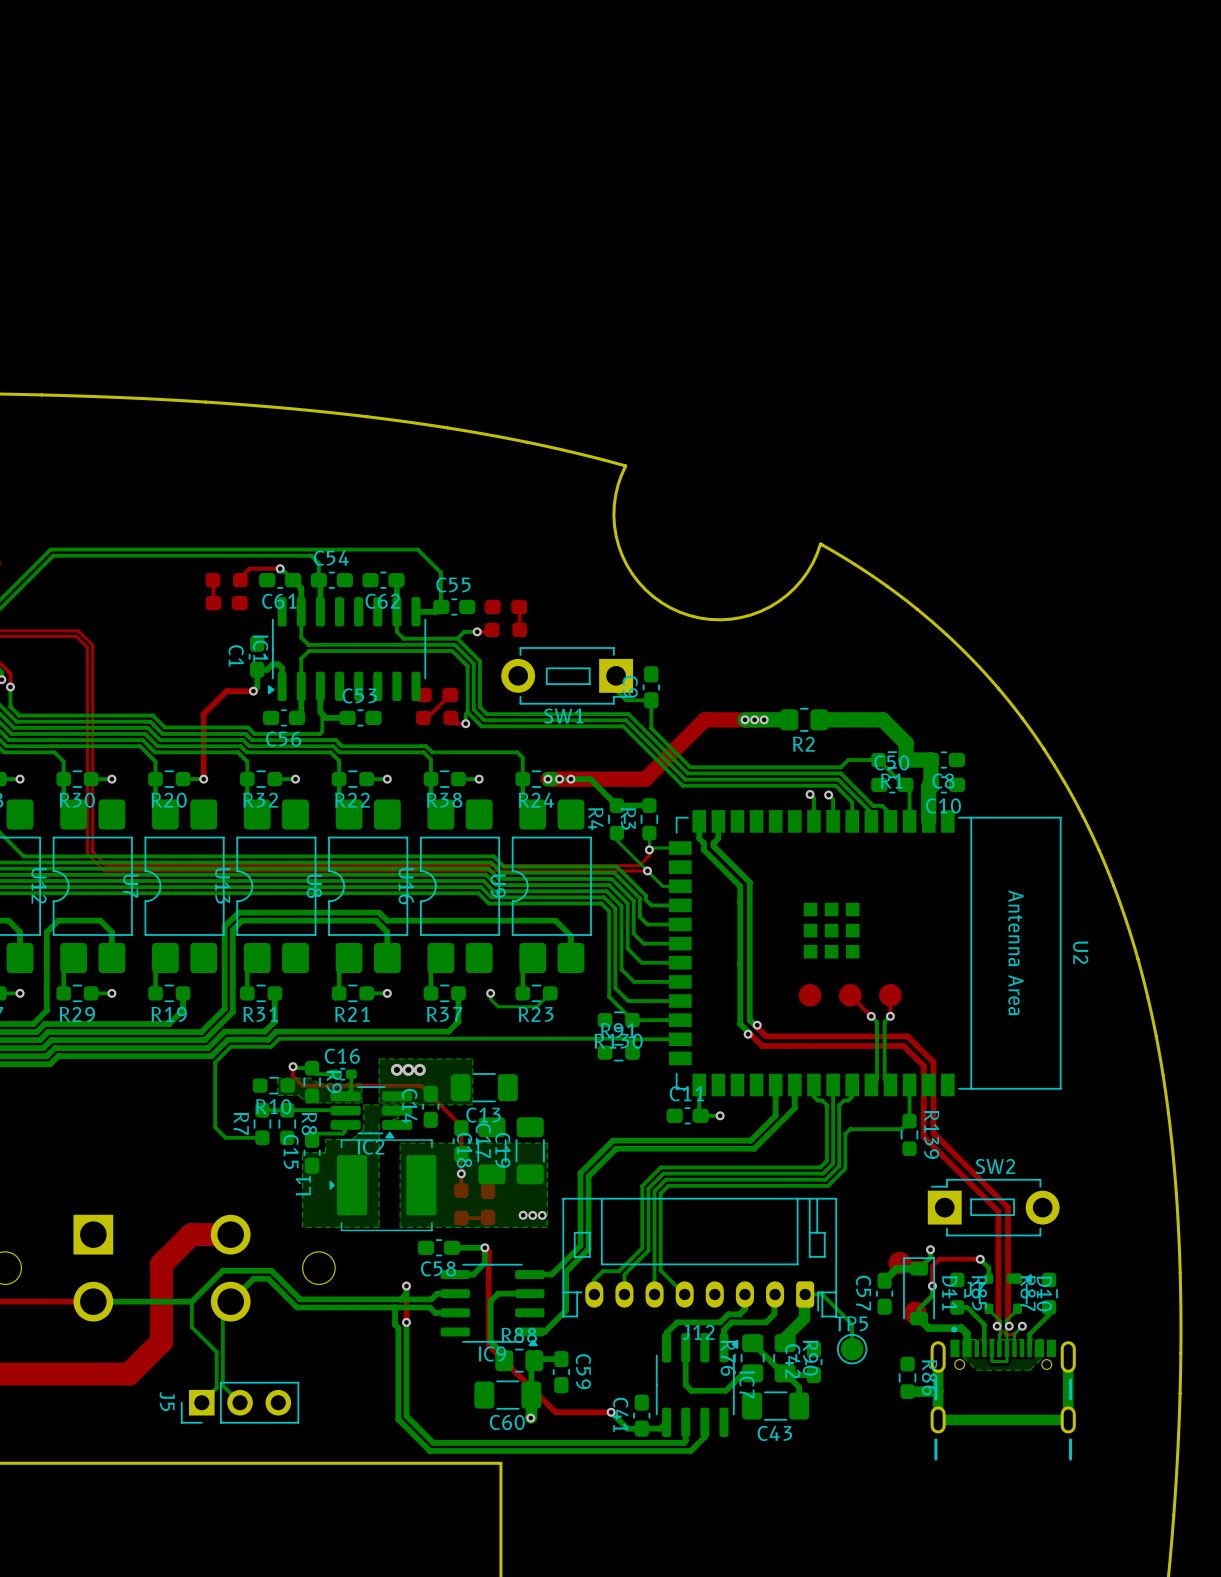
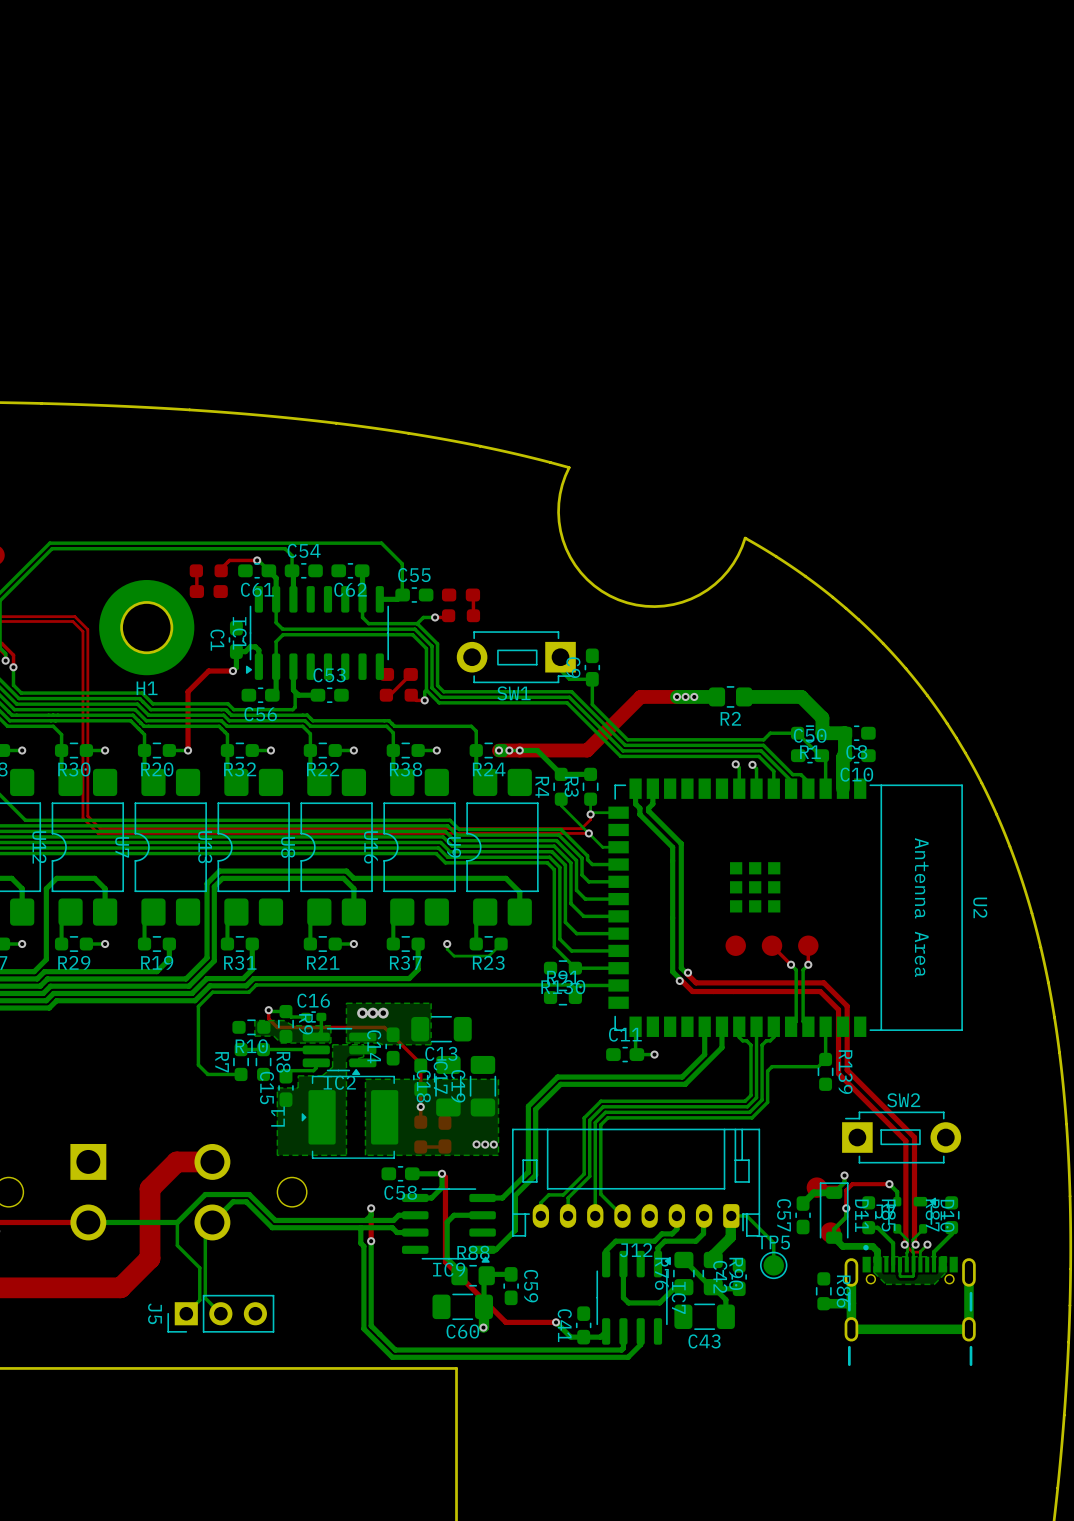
H1: none -> (146, 627)

